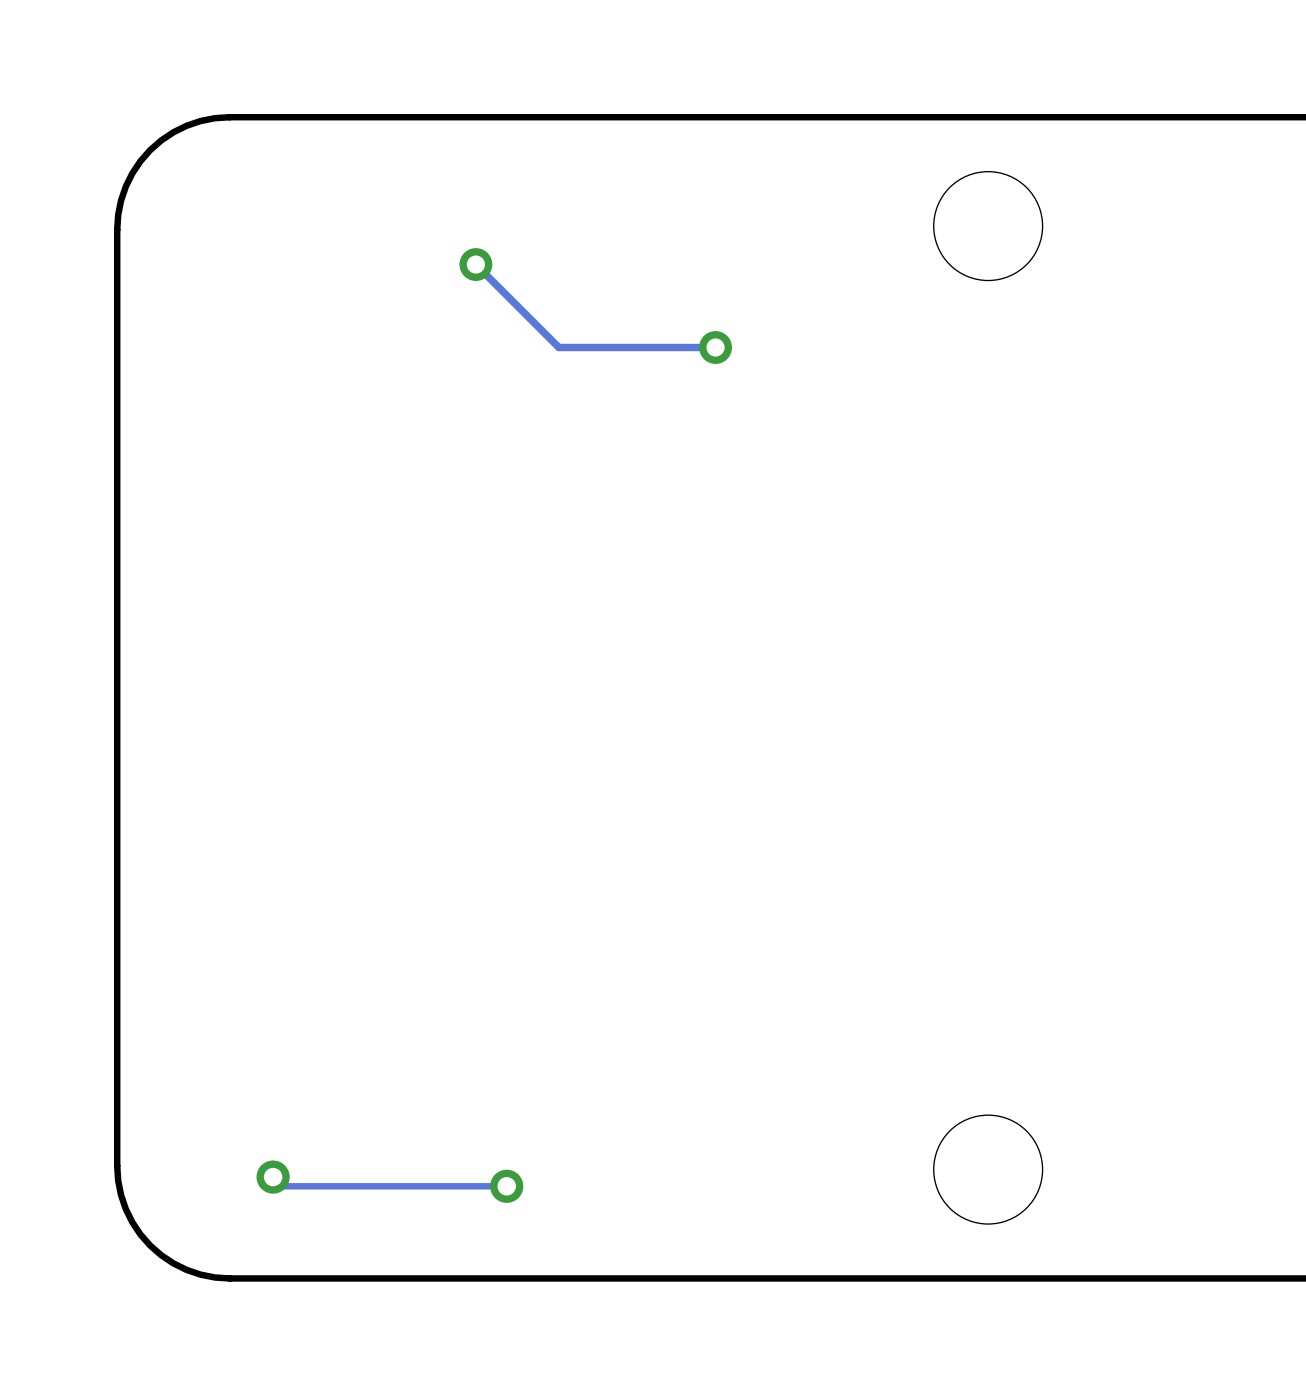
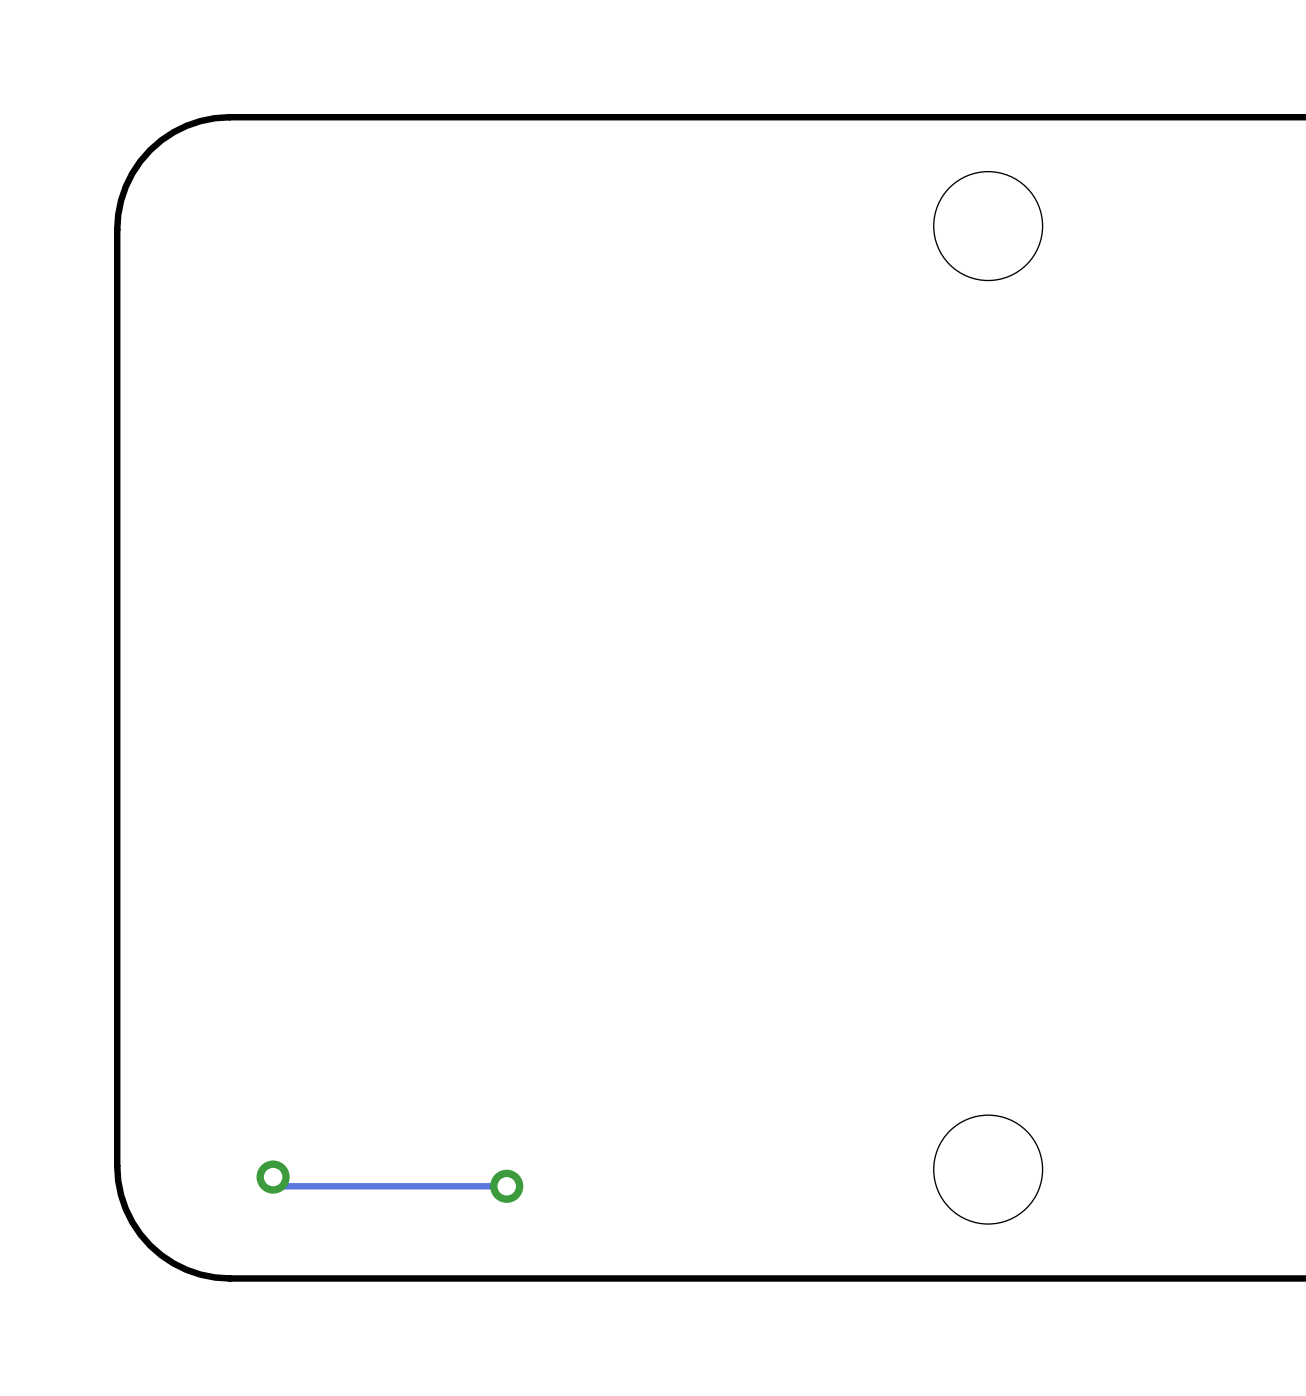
track: (475, 264) (558, 347) (715, 347) -> none
via: (475, 264) -> none
via: (715, 347) -> none

